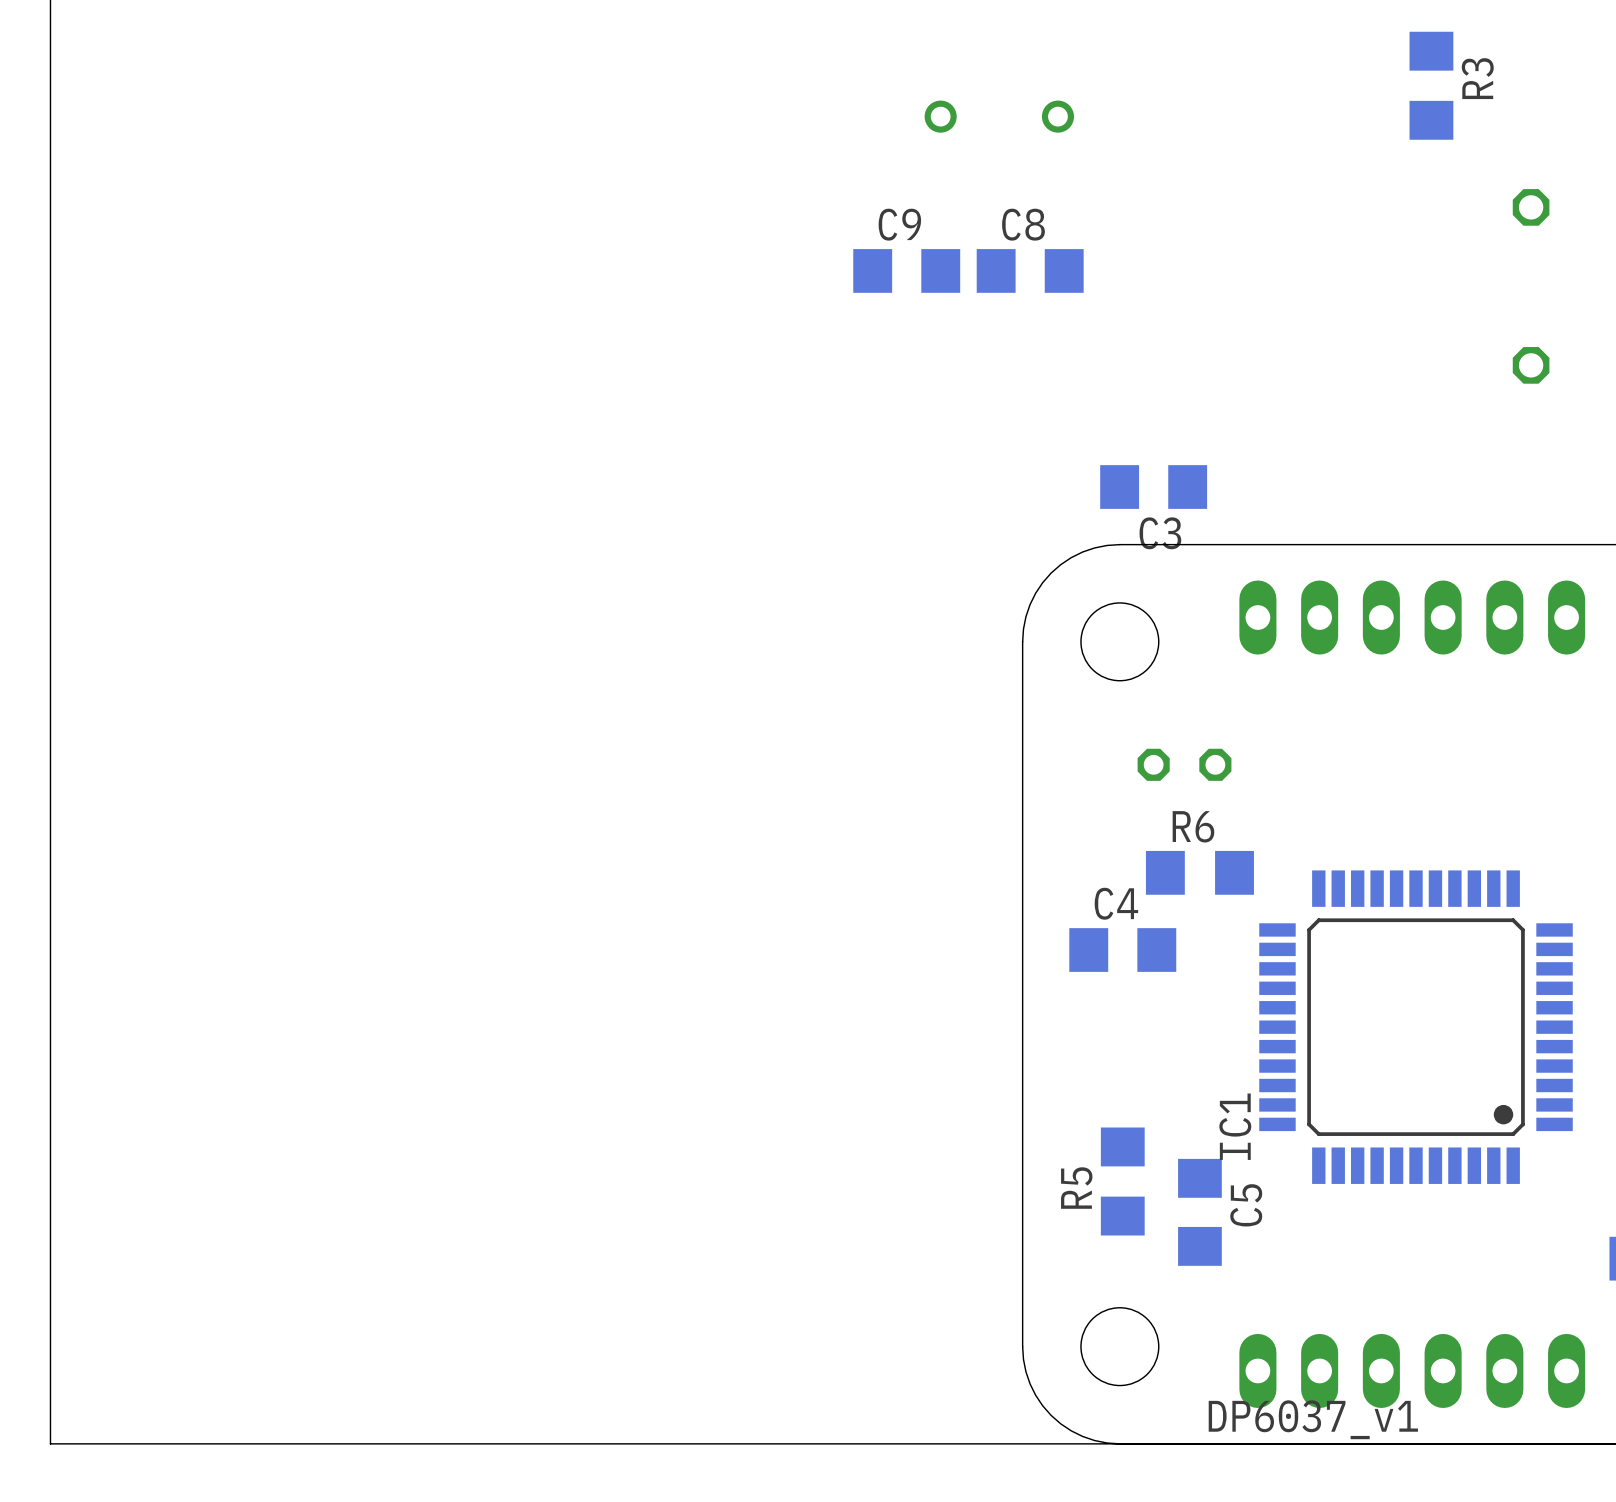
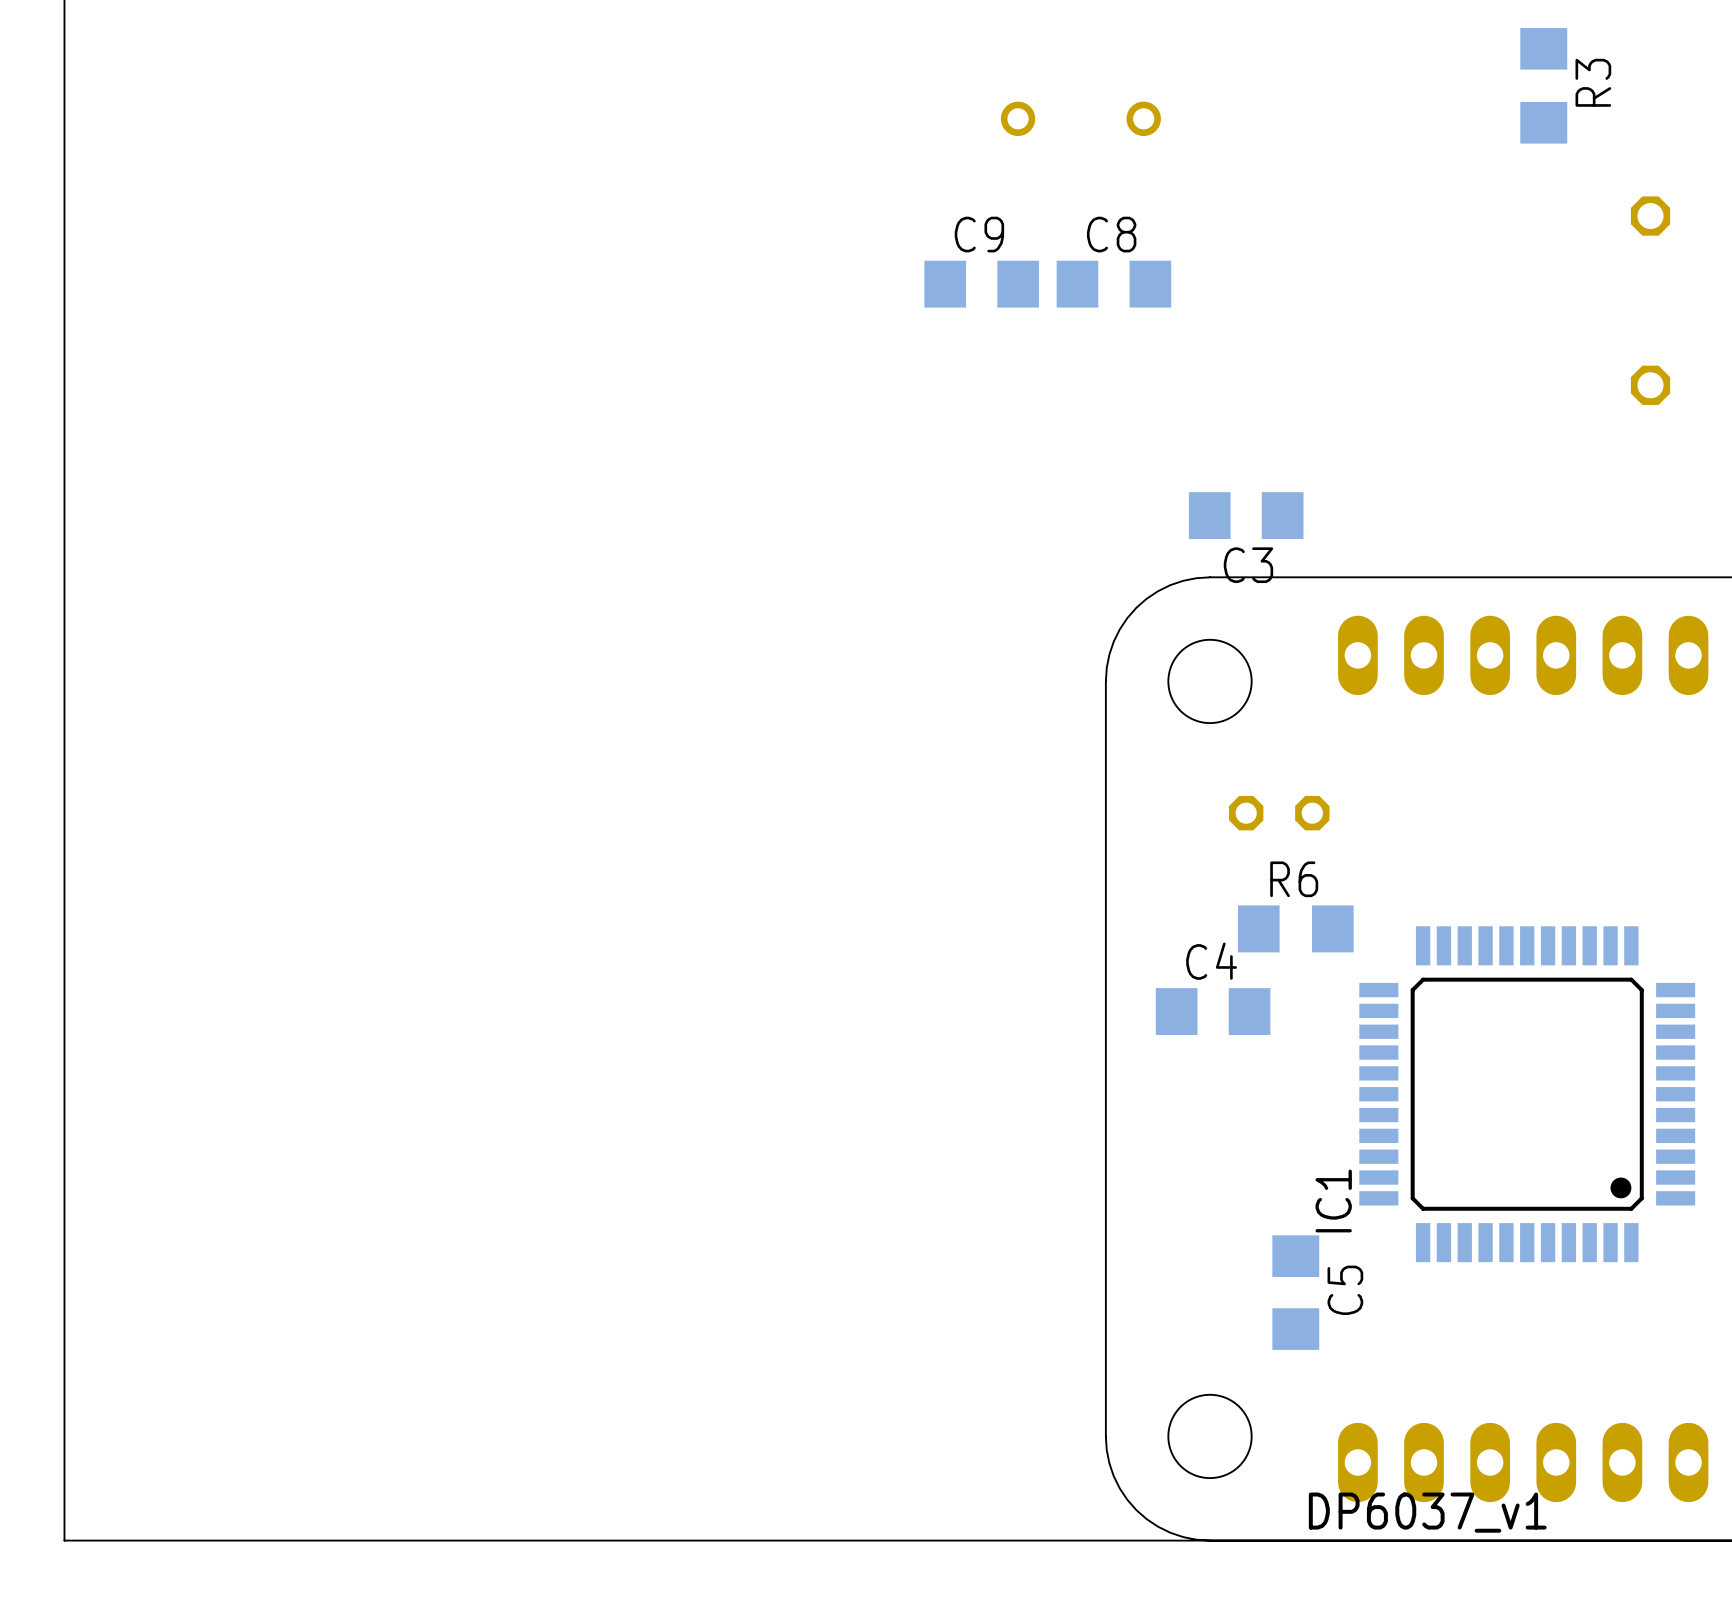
R5: (1122, 1181) -> none

